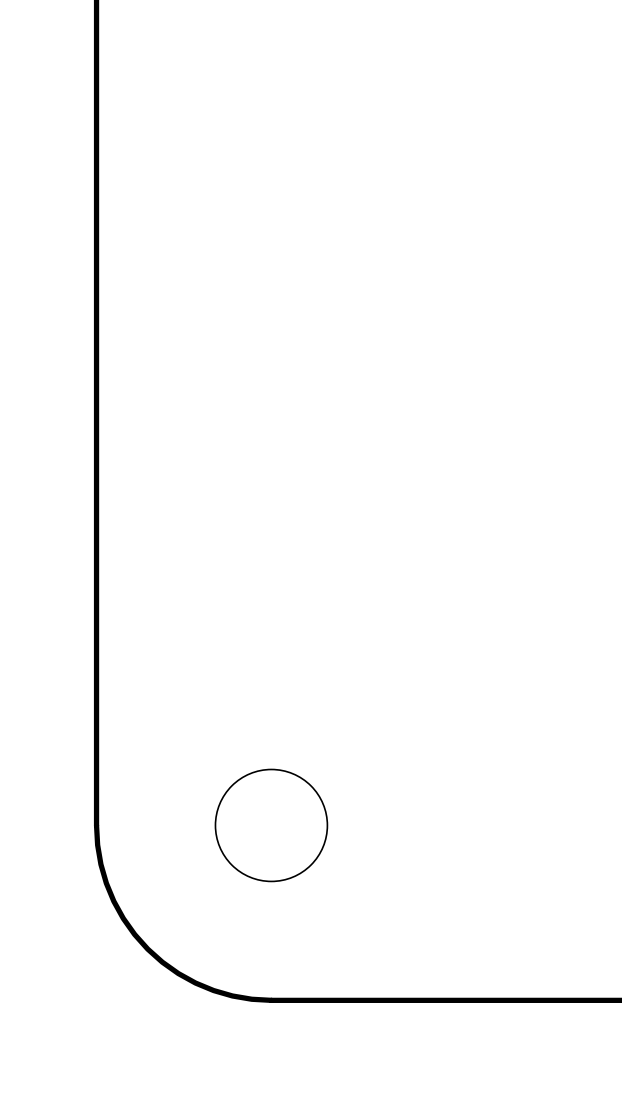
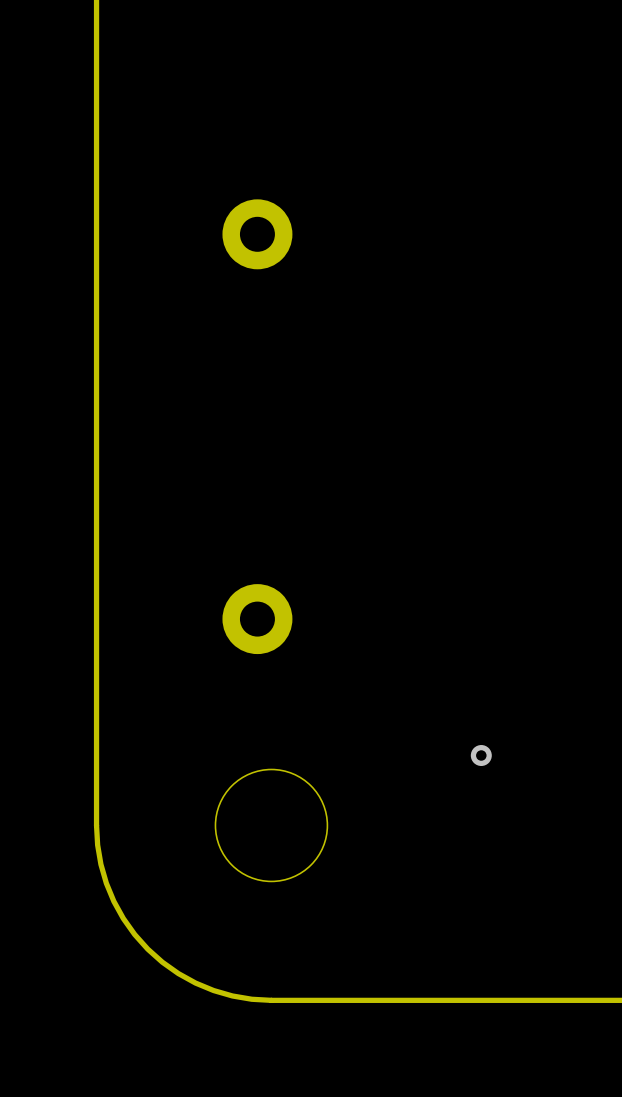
part: none -> (257, 234)
part: none -> (257, 619)
via: none -> (481, 755)

